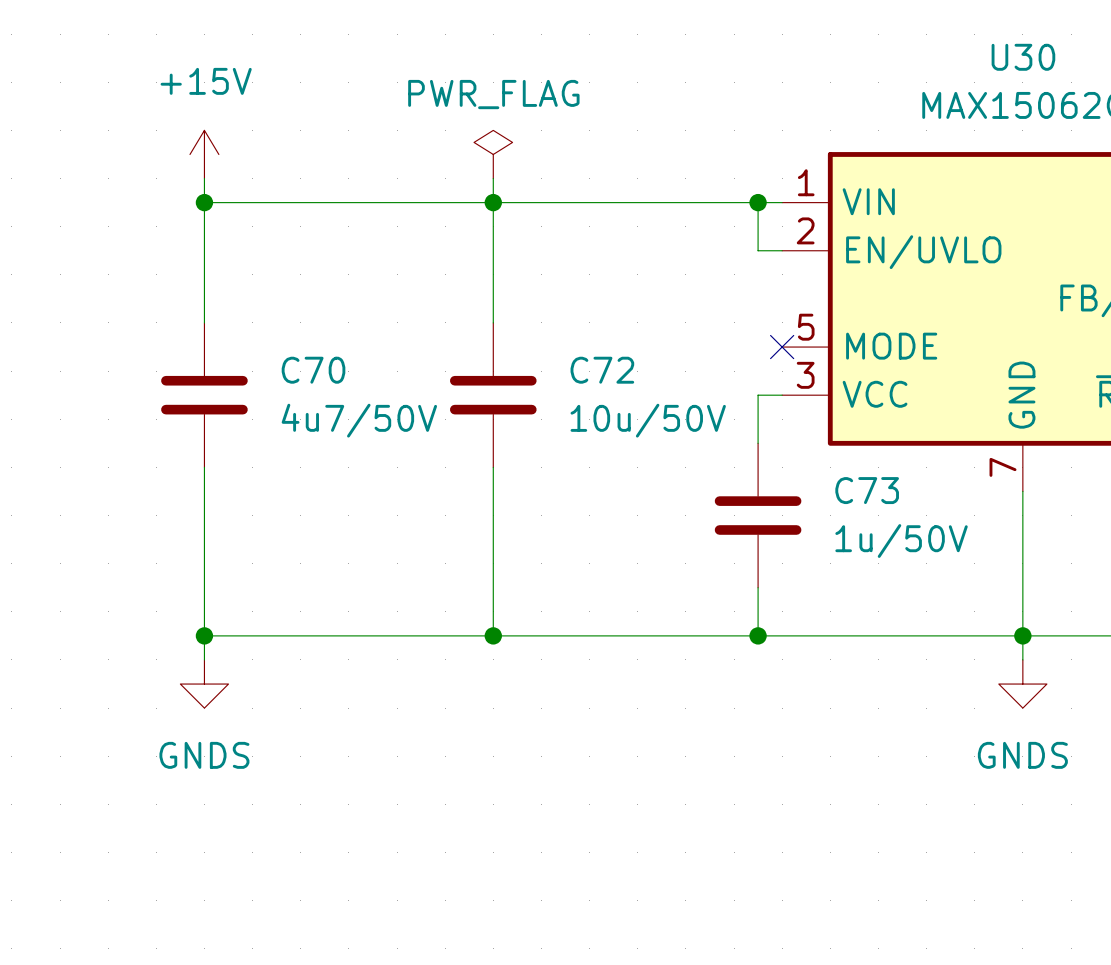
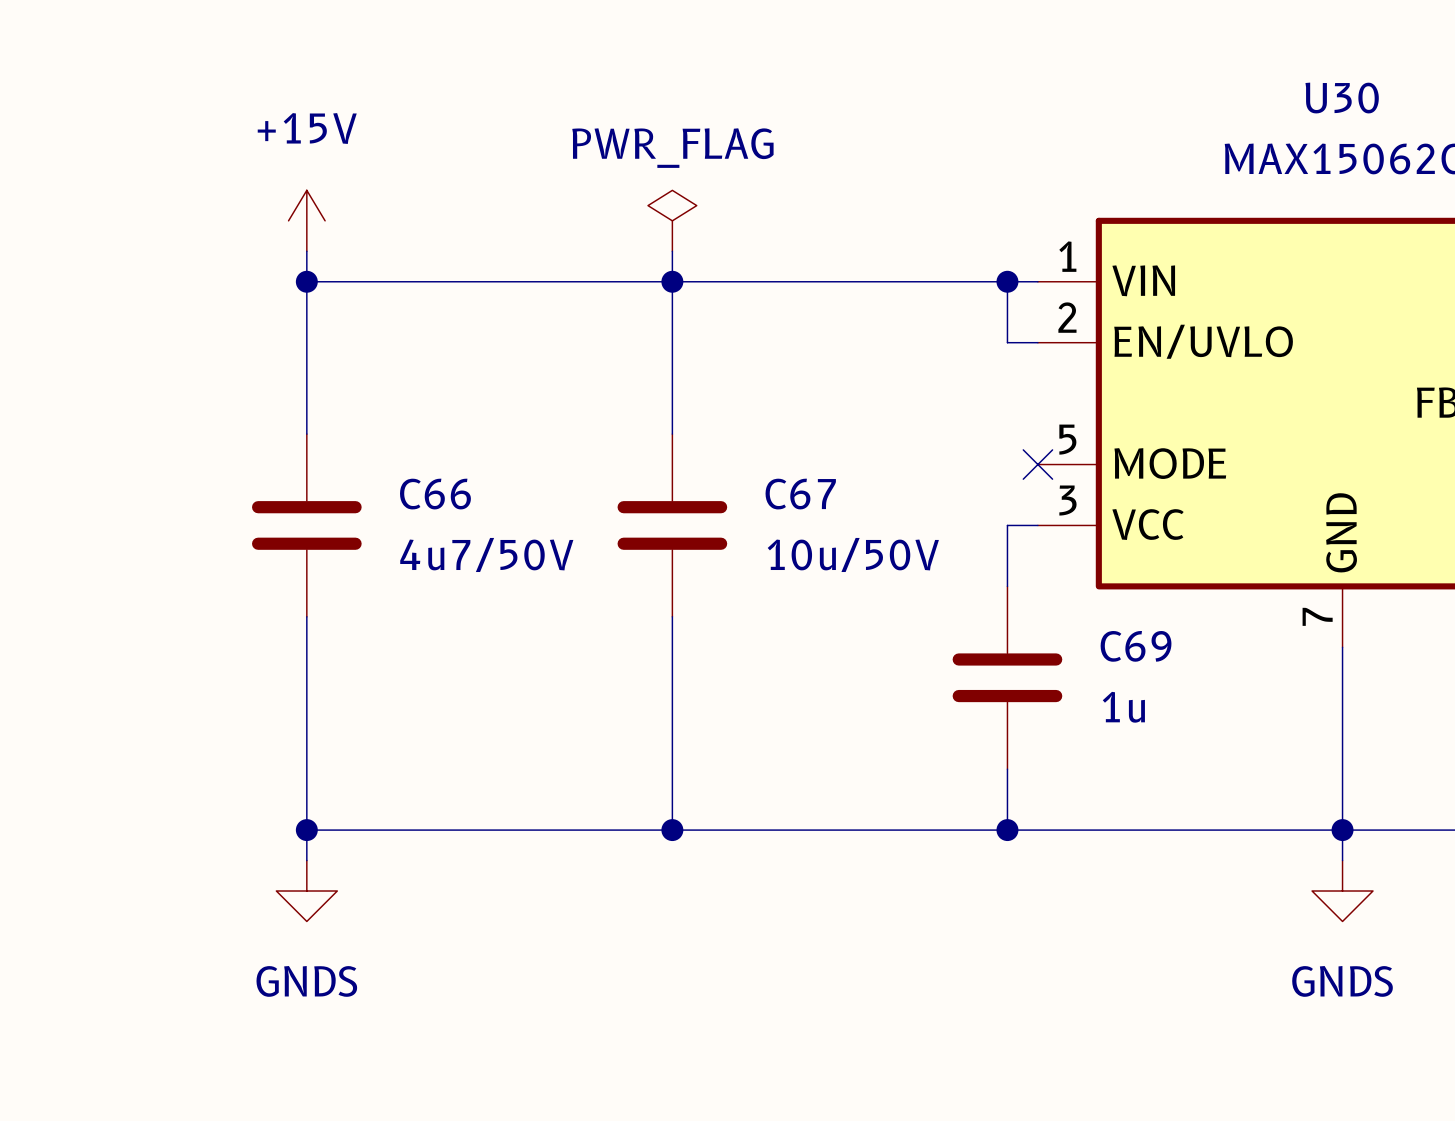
C70 name: C70 (313, 370) -> C66 (435, 494)
C72 name: C72 (602, 370) -> C67 (800, 494)
C73 name: C73 (867, 490) -> C69 (1136, 646)
C73 value: 1u/50V (901, 541) -> 1u (1123, 707)

